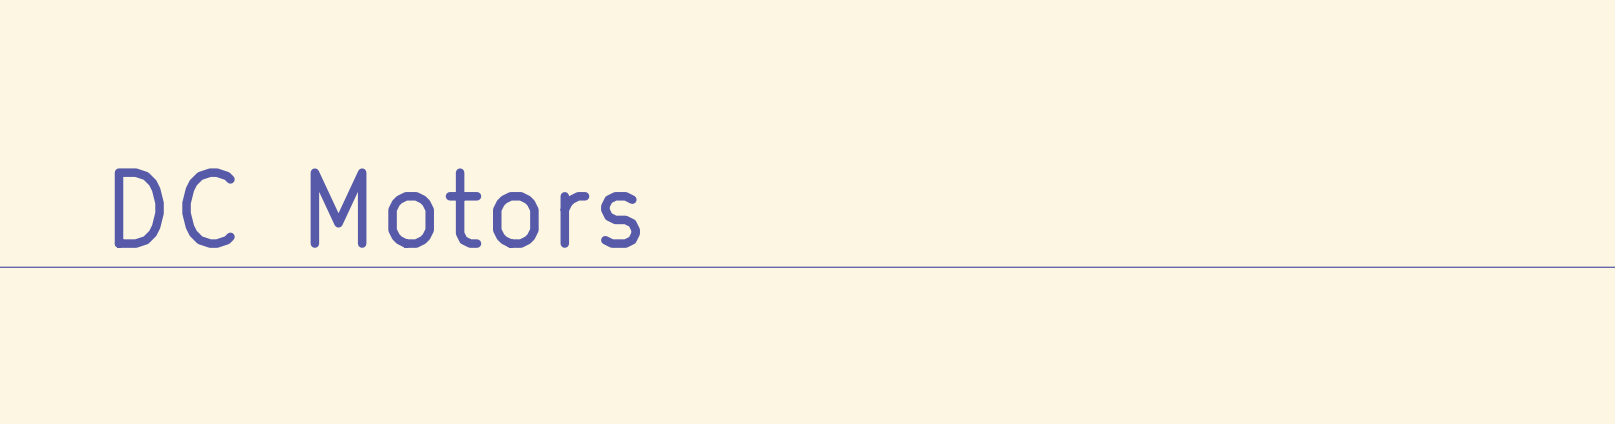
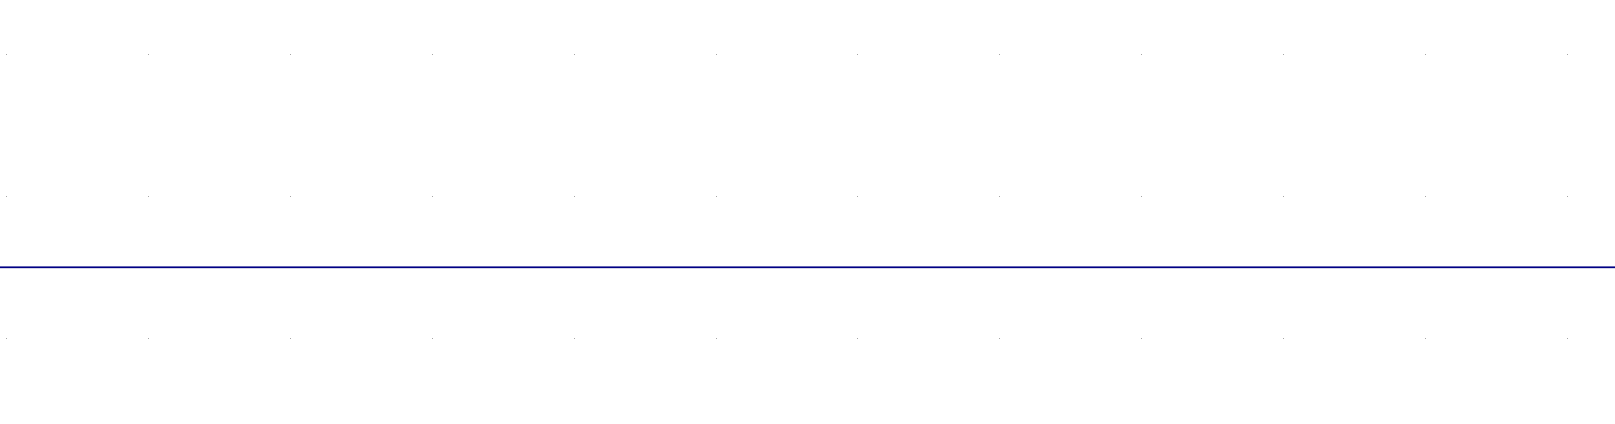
text: DC Motors (377, 208) -> none

